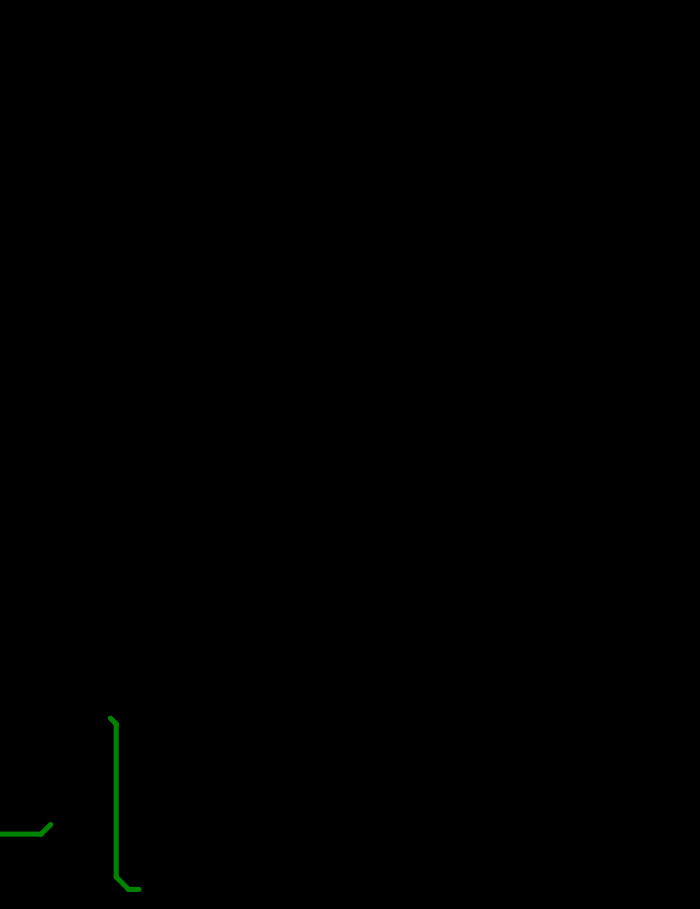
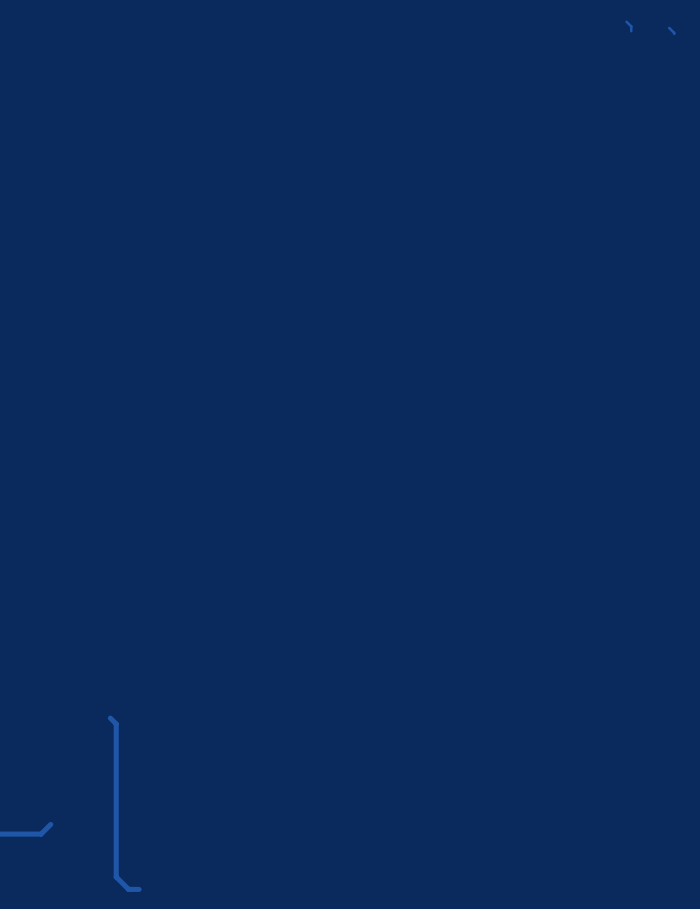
track: none -> (626, 21) (631, 26) (631, 31)
track: none -> (669, 27) (674, 33)

